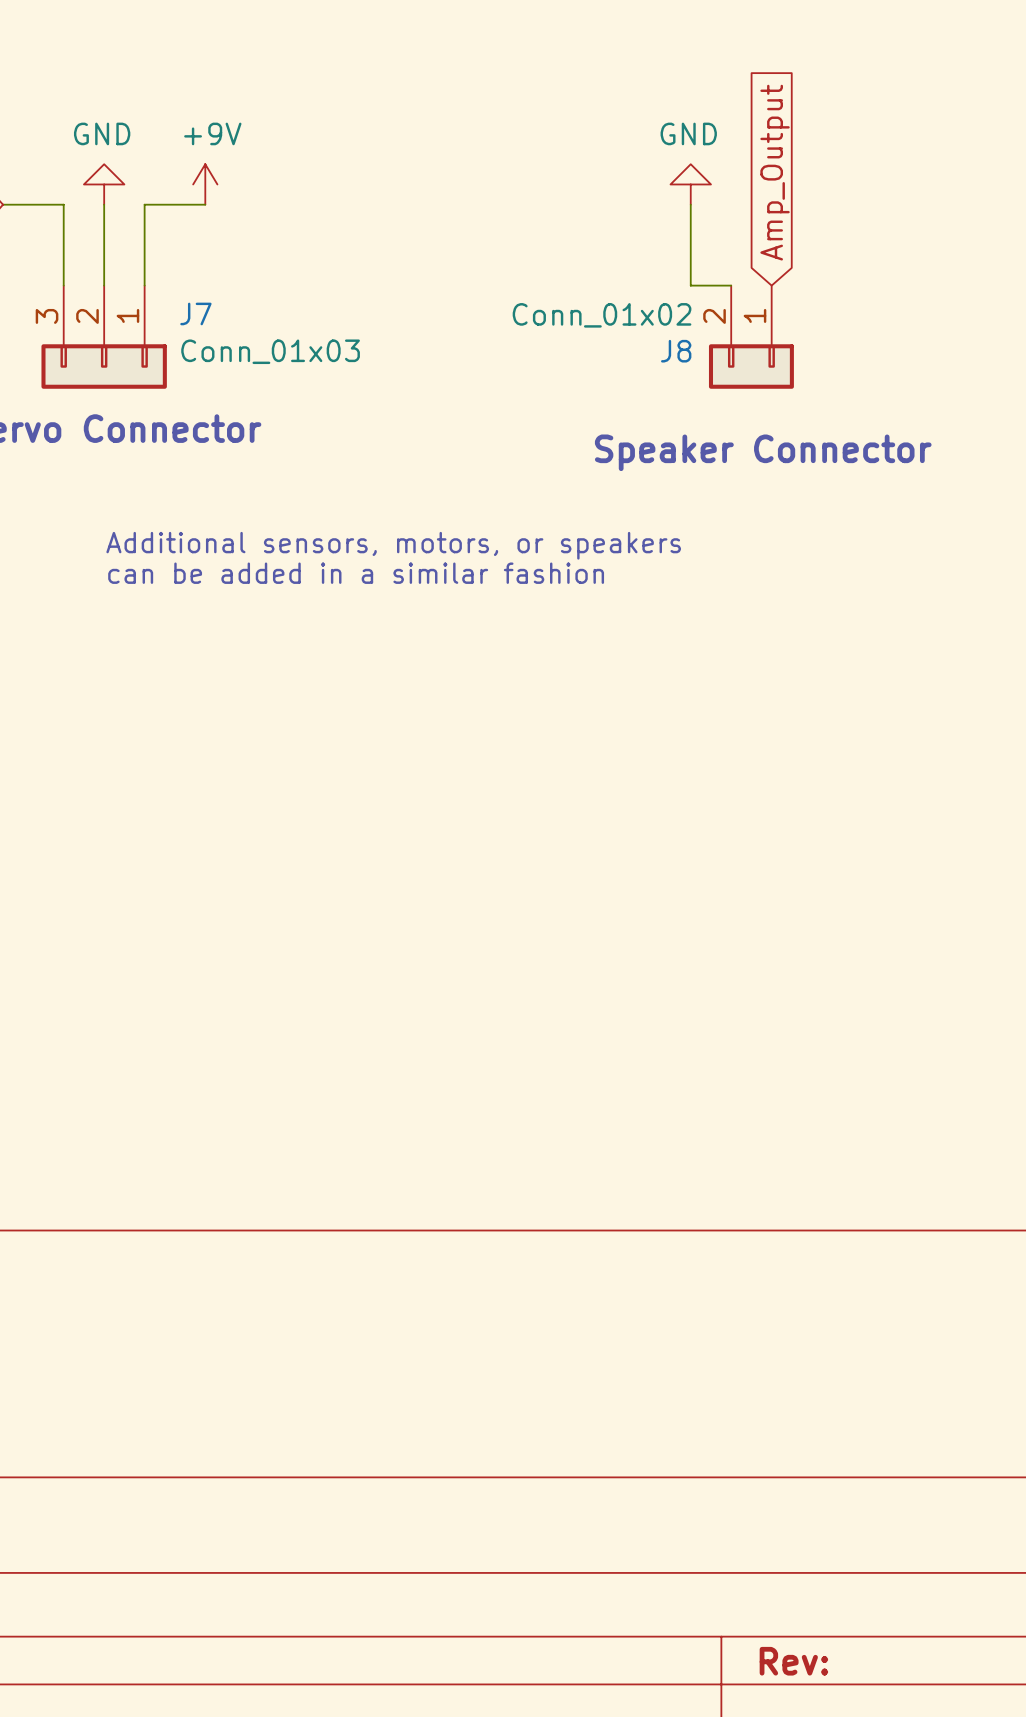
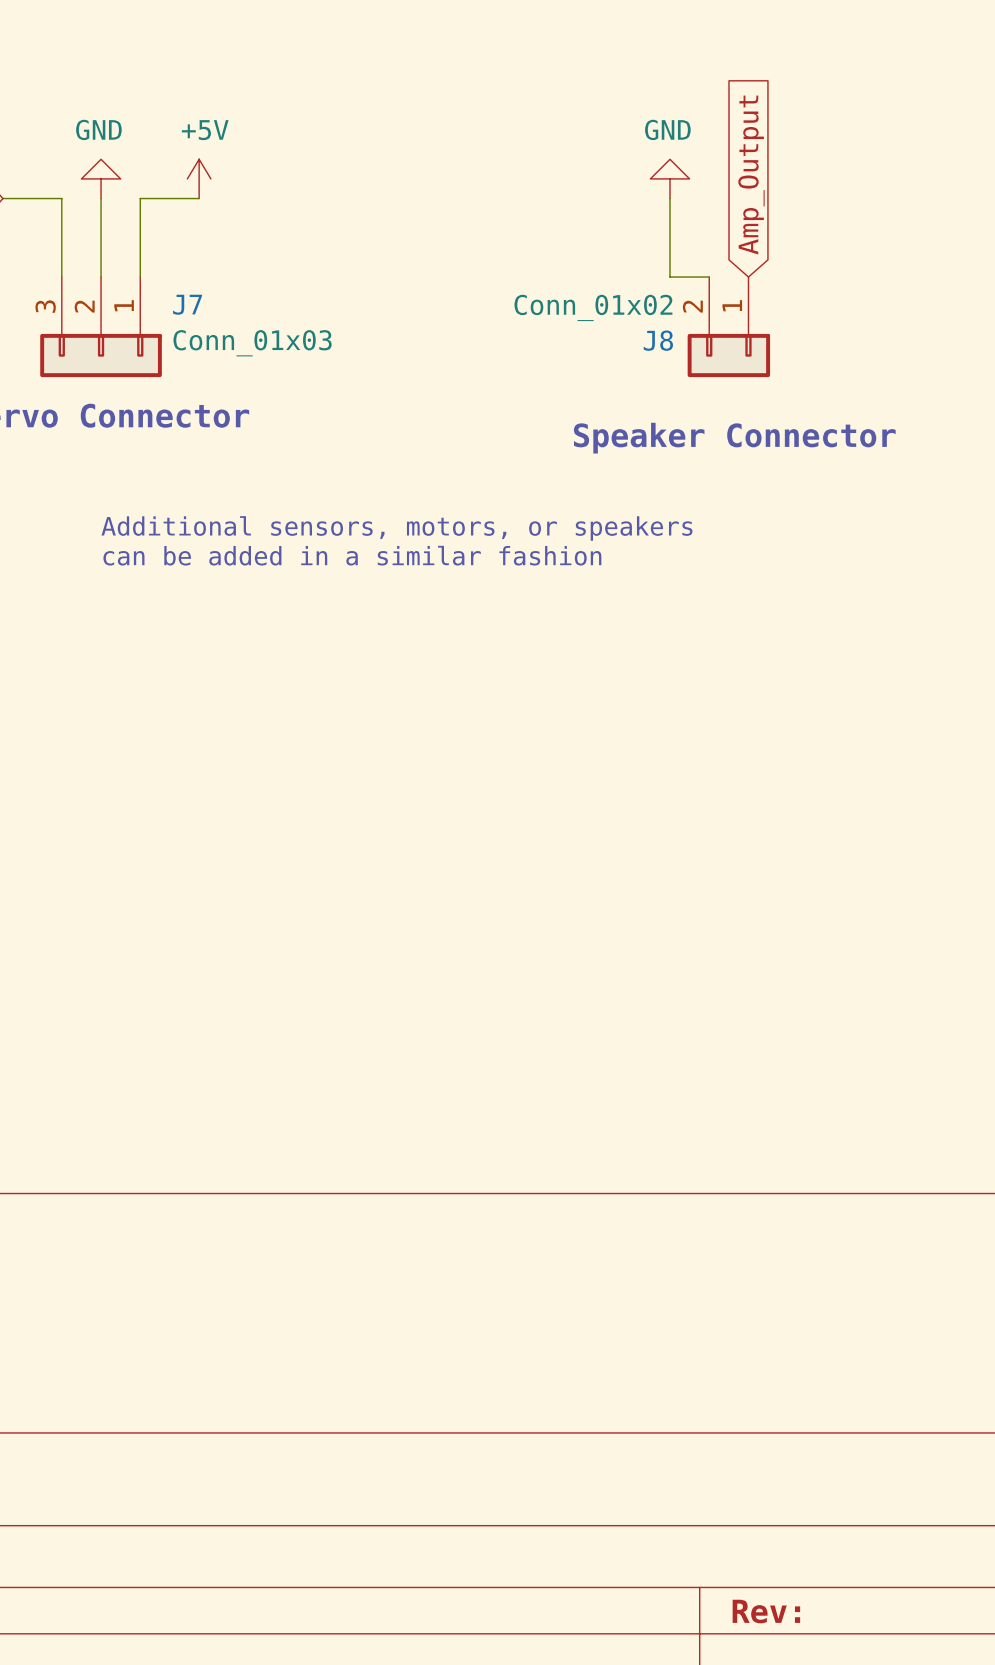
power symbol: +9V (205, 184) -> +5V (199, 178)

